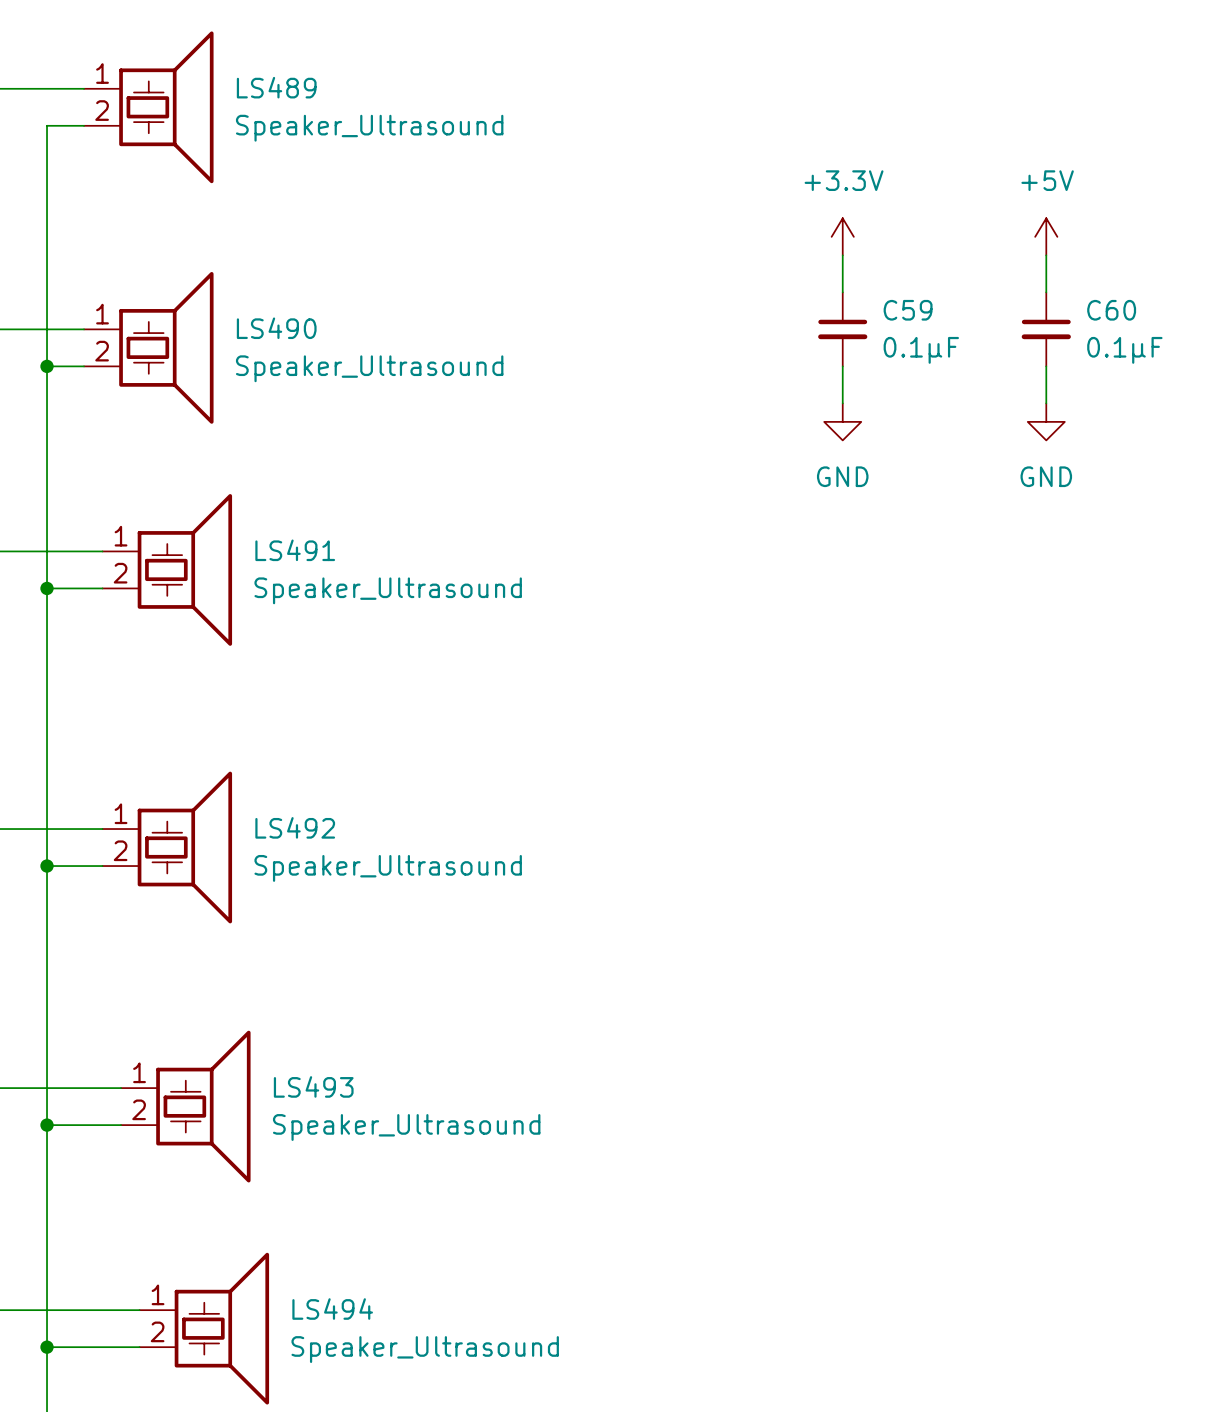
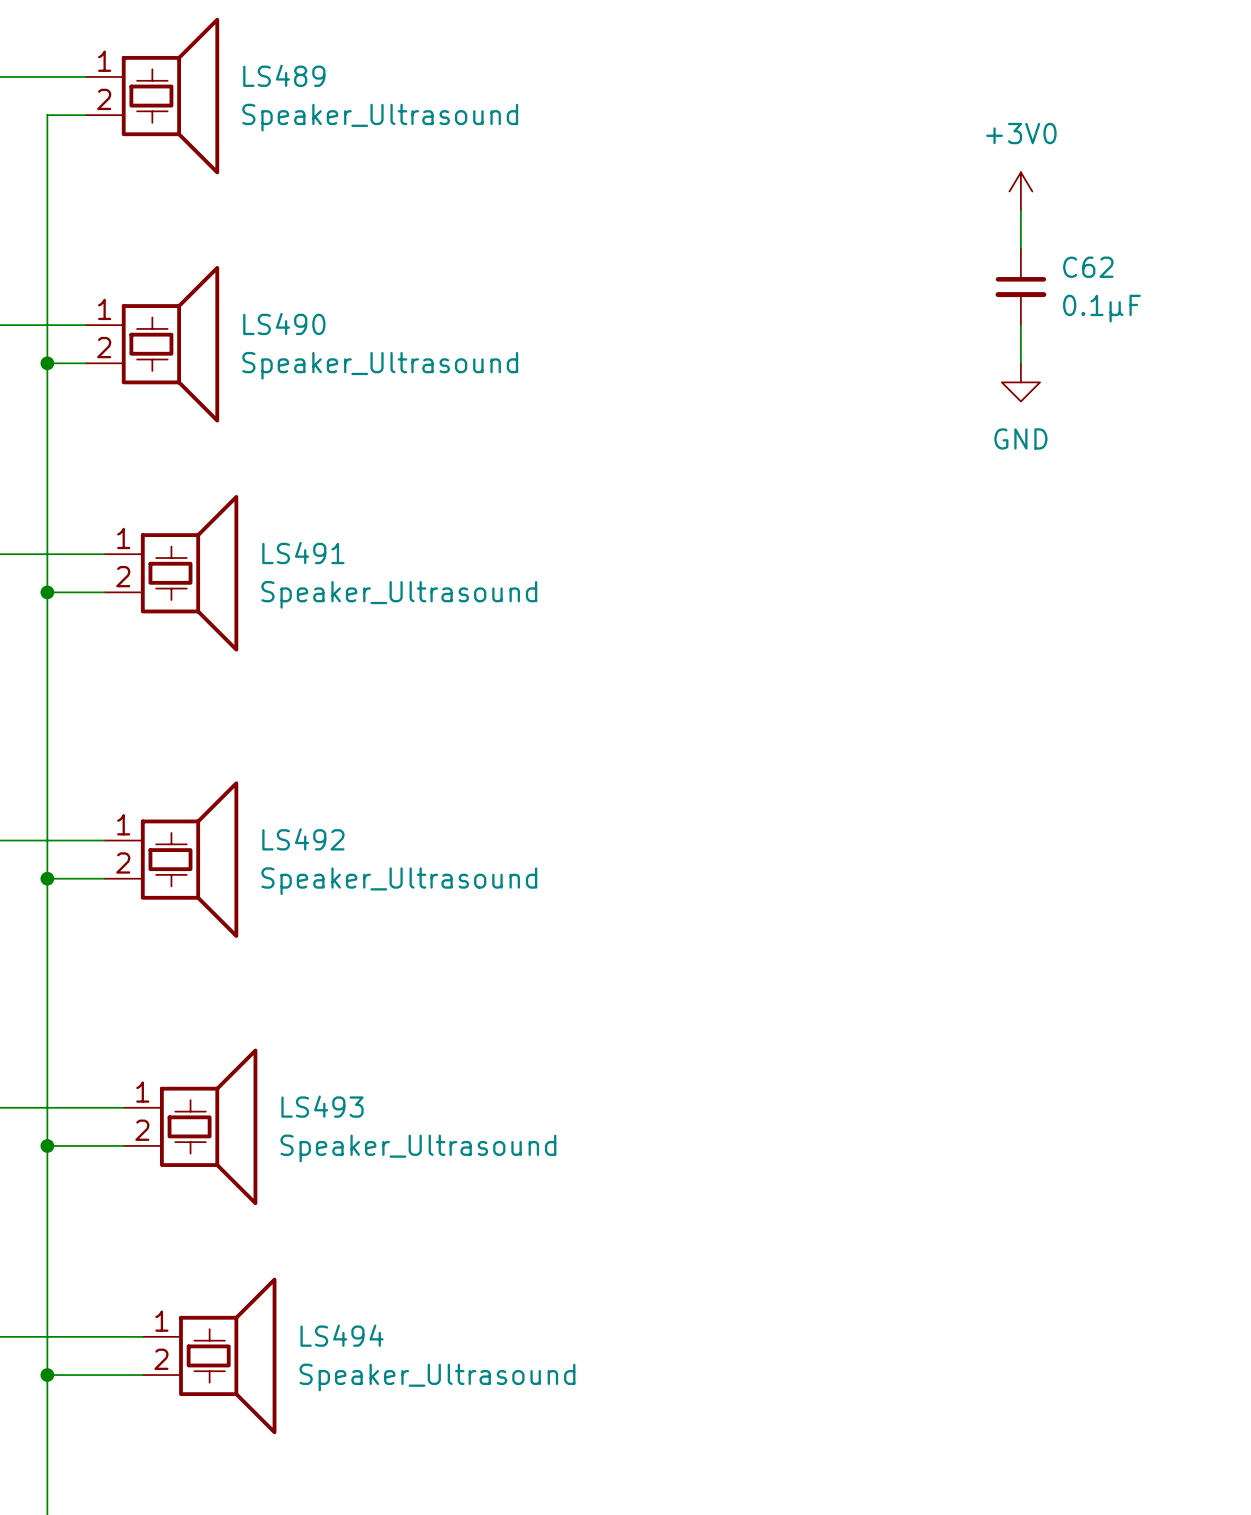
power symbol: none -> +3V0 (1020, 191)
power symbol: +3.3V (842, 236) -> none
power symbol: +5V (1046, 236) -> none
wire: (842, 255) (842, 292) -> none
wire: (1046, 255) (1046, 292) -> (1020, 210) (1020, 248)
C62: none -> 0.1μF (1020, 286)
C59: 0.1μF (842, 329) -> none
C60: 0.1μF (1046, 329) -> none
wire: (842, 366) (842, 403) -> none
wire: (1046, 366) (1046, 403) -> (1020, 325) (1020, 363)
power symbol: GND (842, 421) -> none
power symbol position: GND (1046, 421) -> GND (1020, 382)

